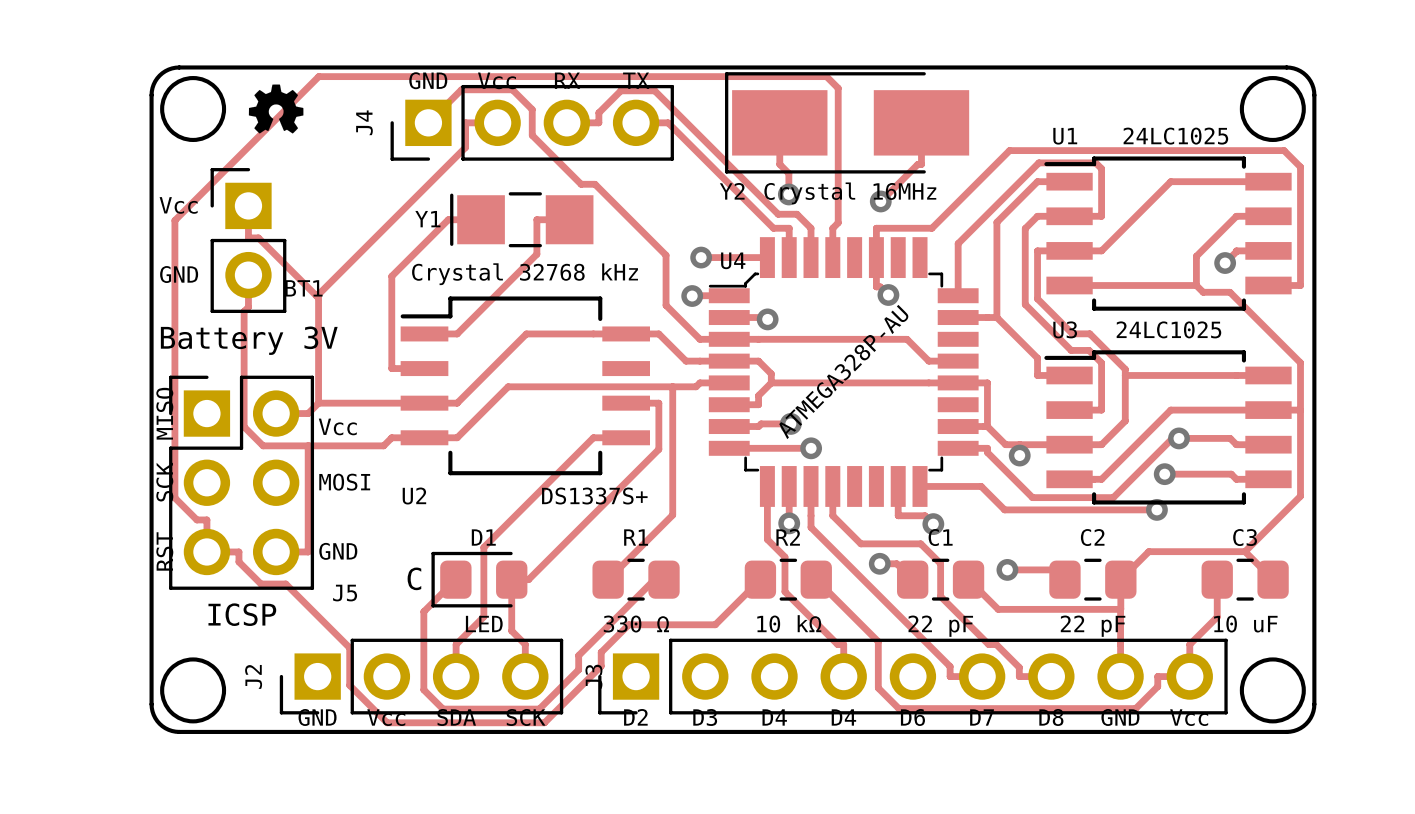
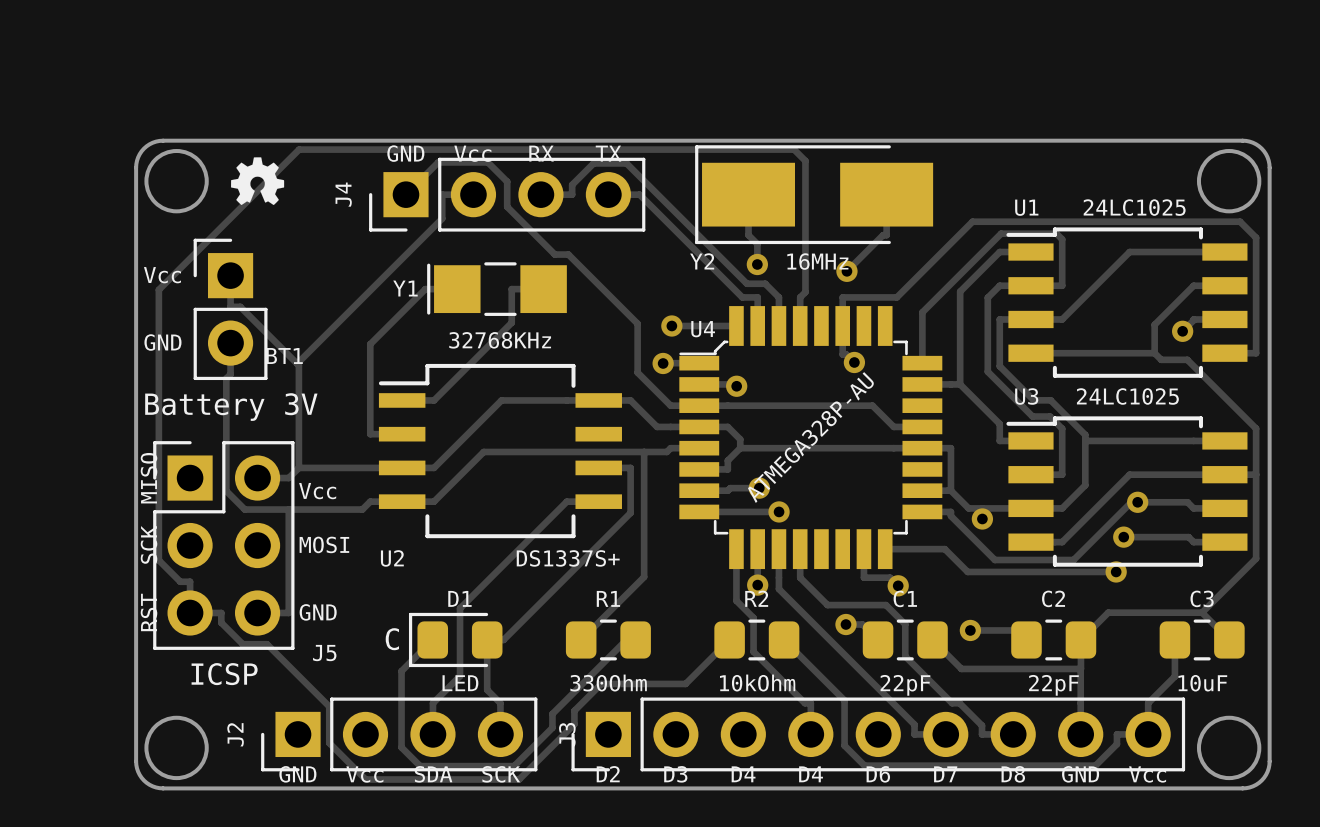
Y2 value: Crystal 16MHz (850, 193) -> 16MHz (817, 261)
Y1 value: Crystal 32768 kHz (525, 274) -> 32768KHz (500, 340)
R2 value: 10 kΩ (789, 623) -> 10kOhm (757, 683)
R1 value: 330 Ω (636, 624) -> 330Ohm (608, 683)
C3 value: 10 uF (1245, 624) -> 10uF (1202, 683)
C1 value: 22 pF (940, 626) -> 22pF (905, 685)
C2 value: 22 pF (1093, 626) -> 22pF (1053, 685)

